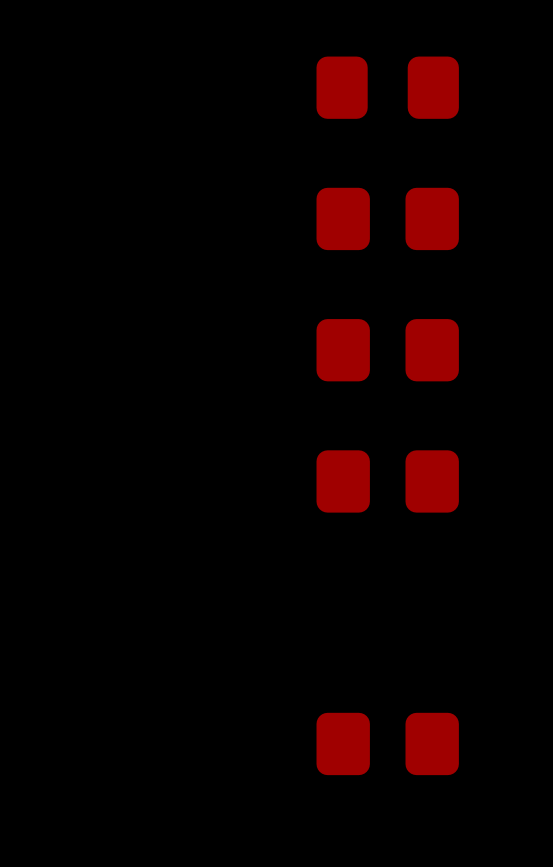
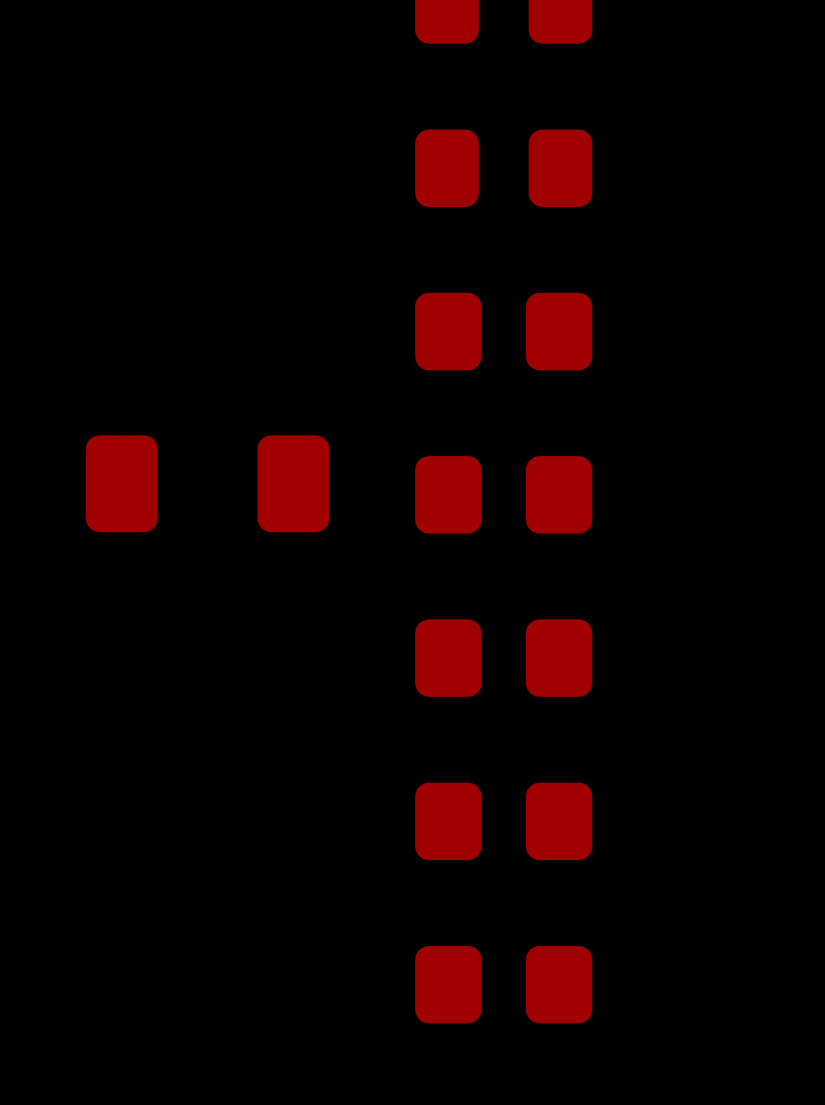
part: none -> (207, 483)
part: none -> (503, 821)

